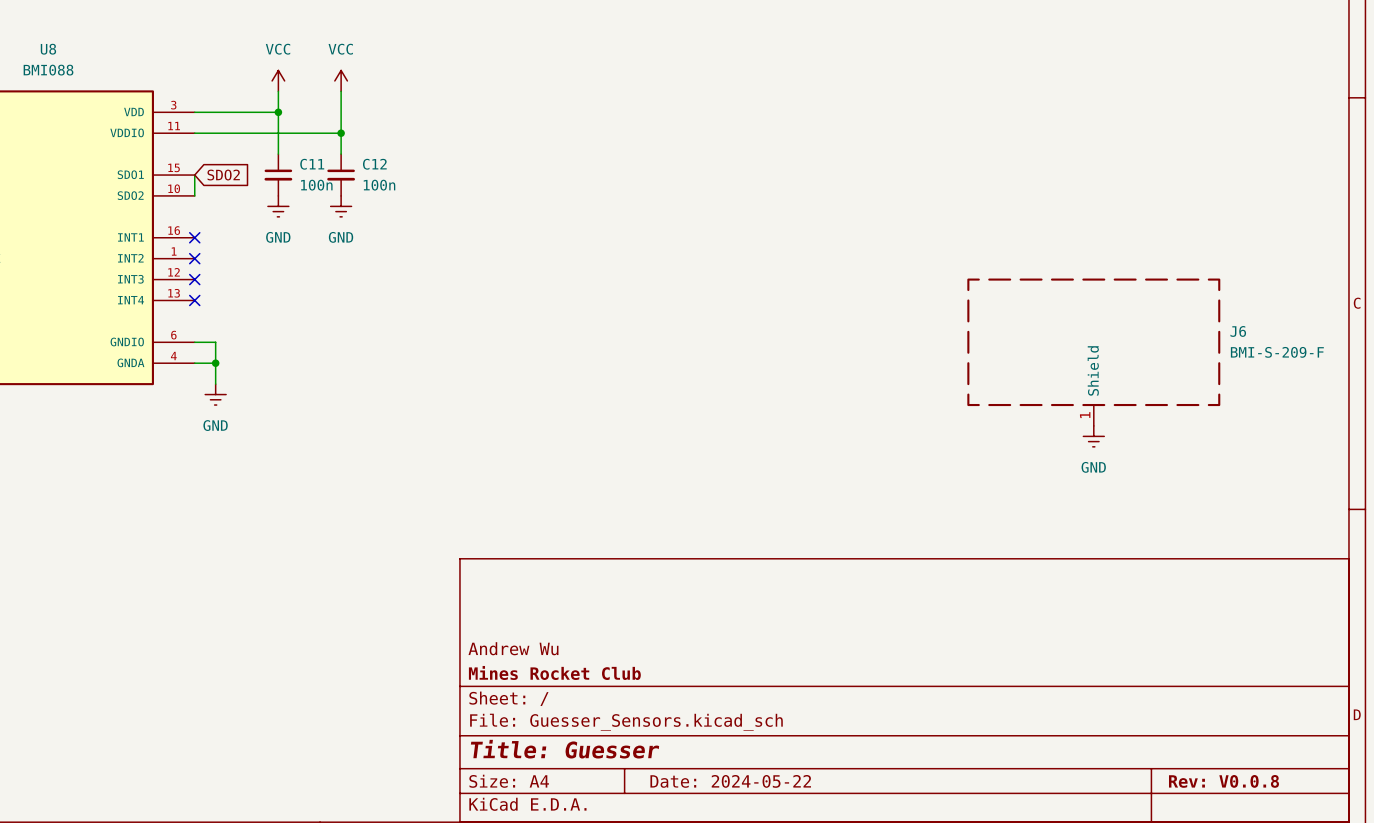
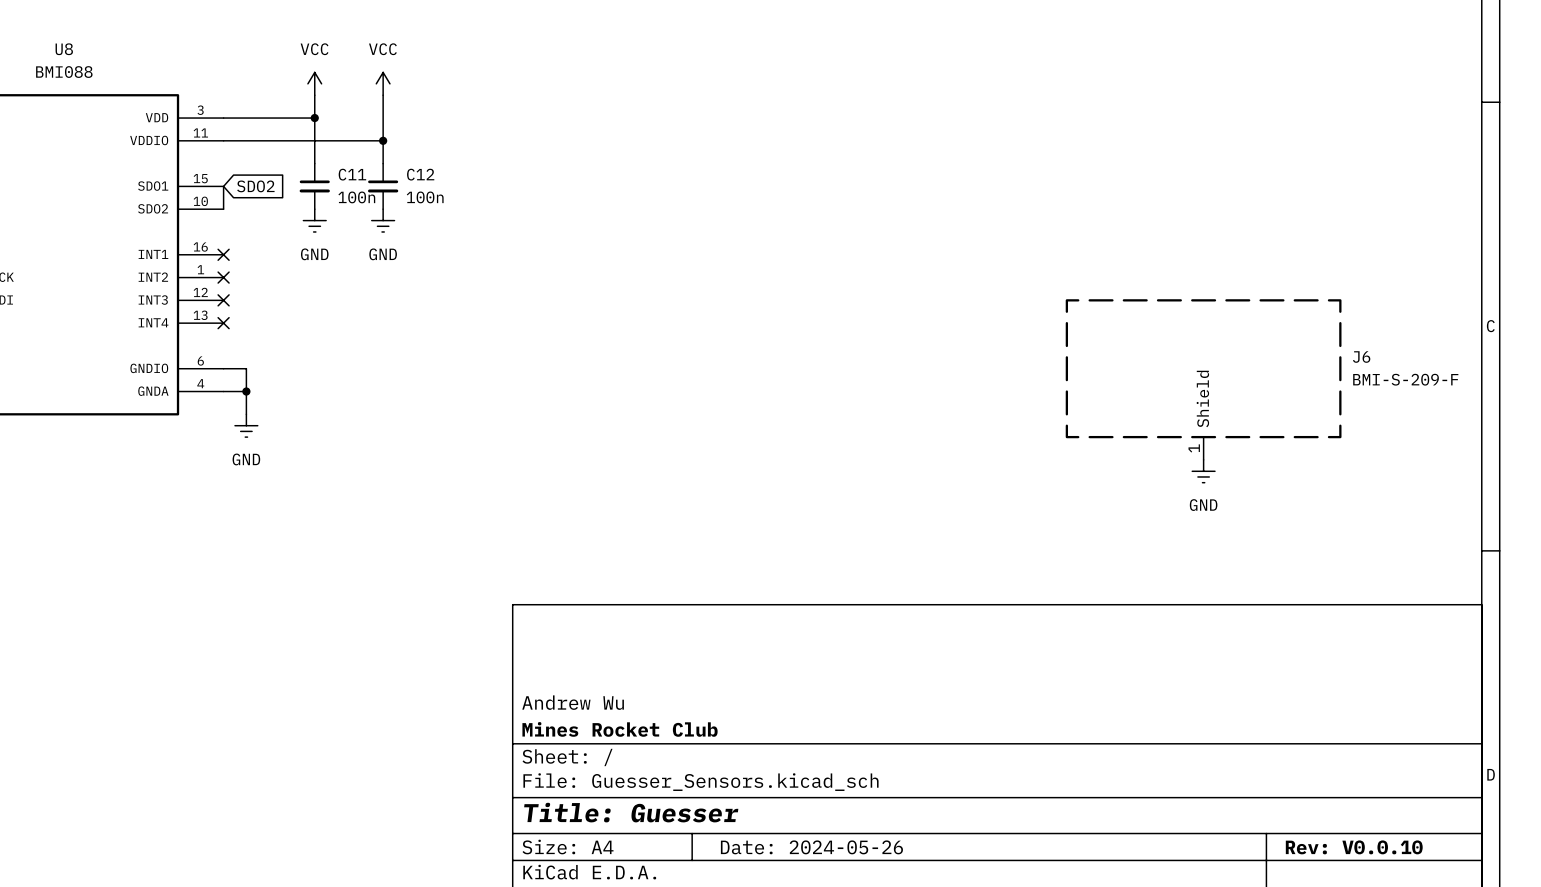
title block: Date: 2024-05-22 (730, 781) -> Date: 2024-05-26 (811, 847)
title block: Rev: V0.0.8 (1223, 781) -> Rev: V0.0.10 (1354, 847)

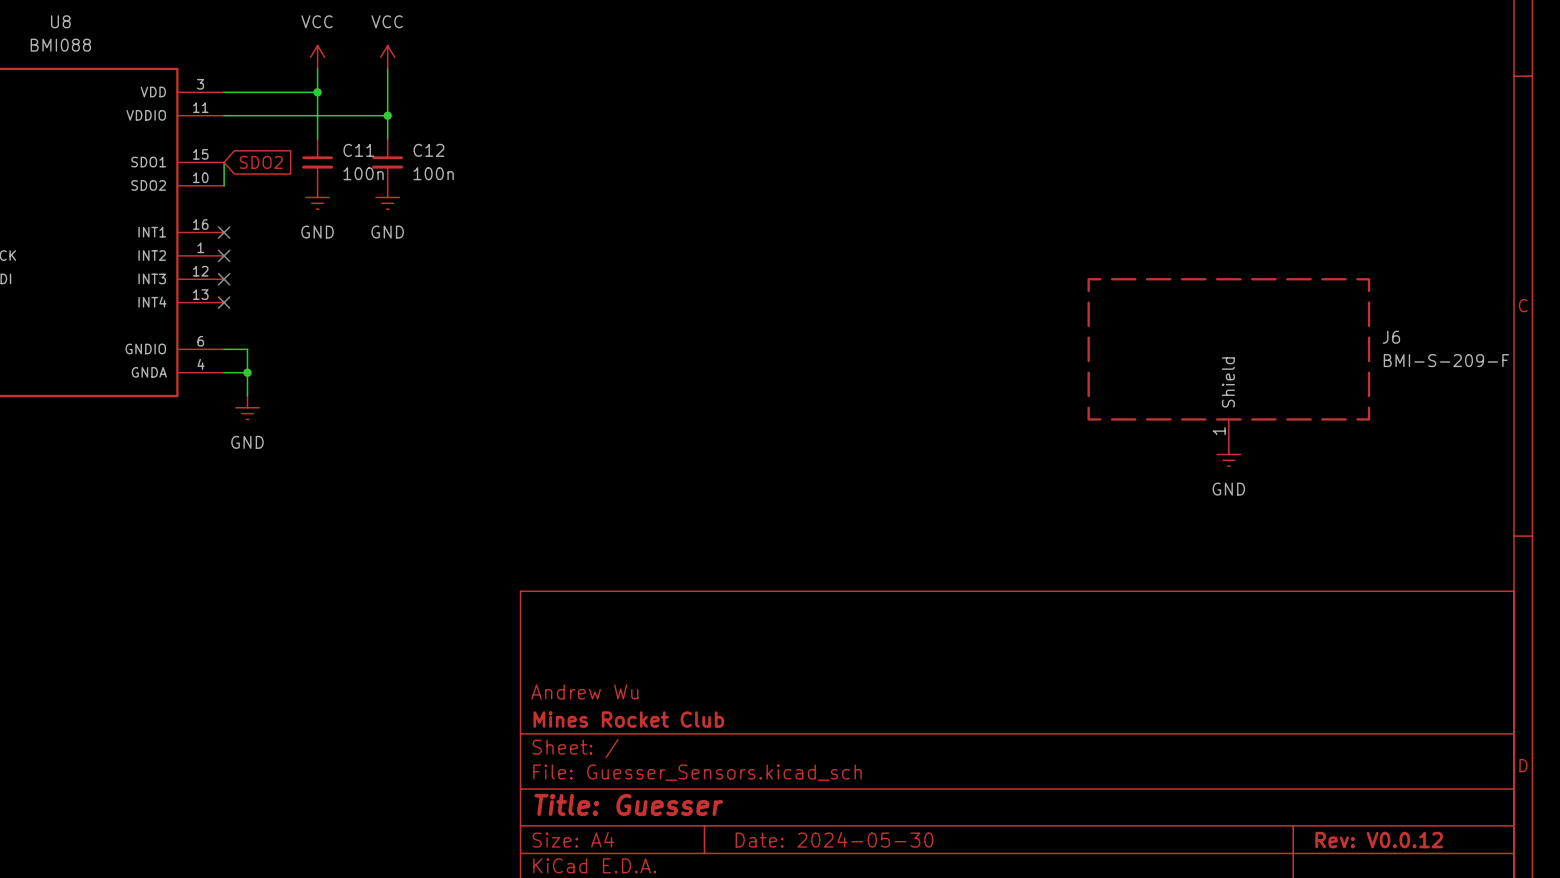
title block: Date: 2024-05-26 (811, 847) -> Date: 2024-05-30 (834, 839)
title block: Rev: V0.0.10 (1354, 847) -> Rev: V0.0.12 (1379, 840)

